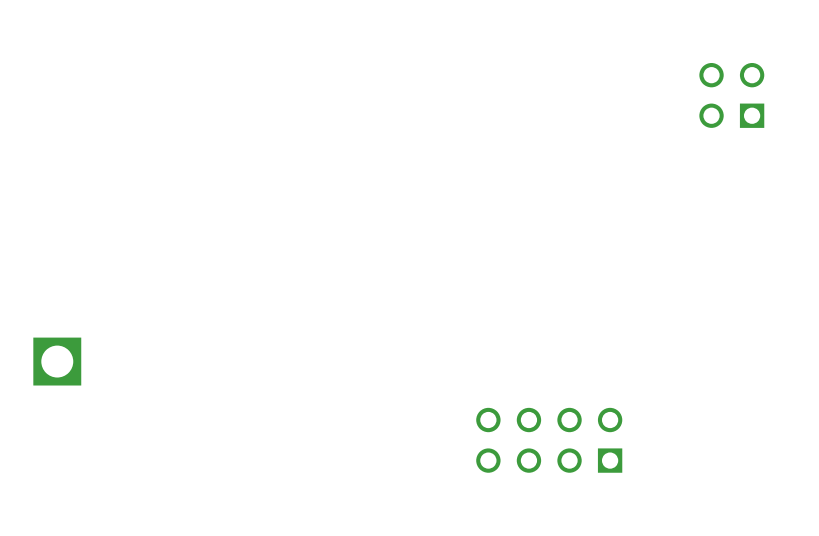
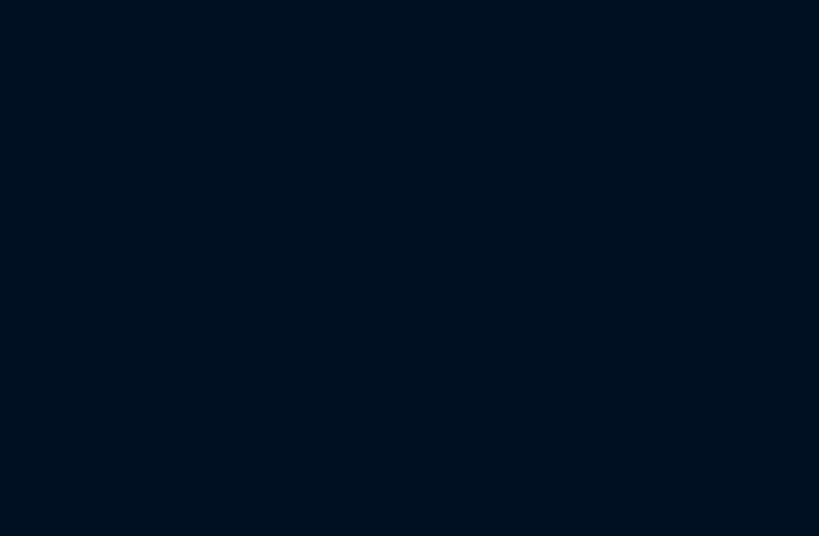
part: (731, 95) -> none
part: (57, 361) -> none
part: (549, 440) -> none

